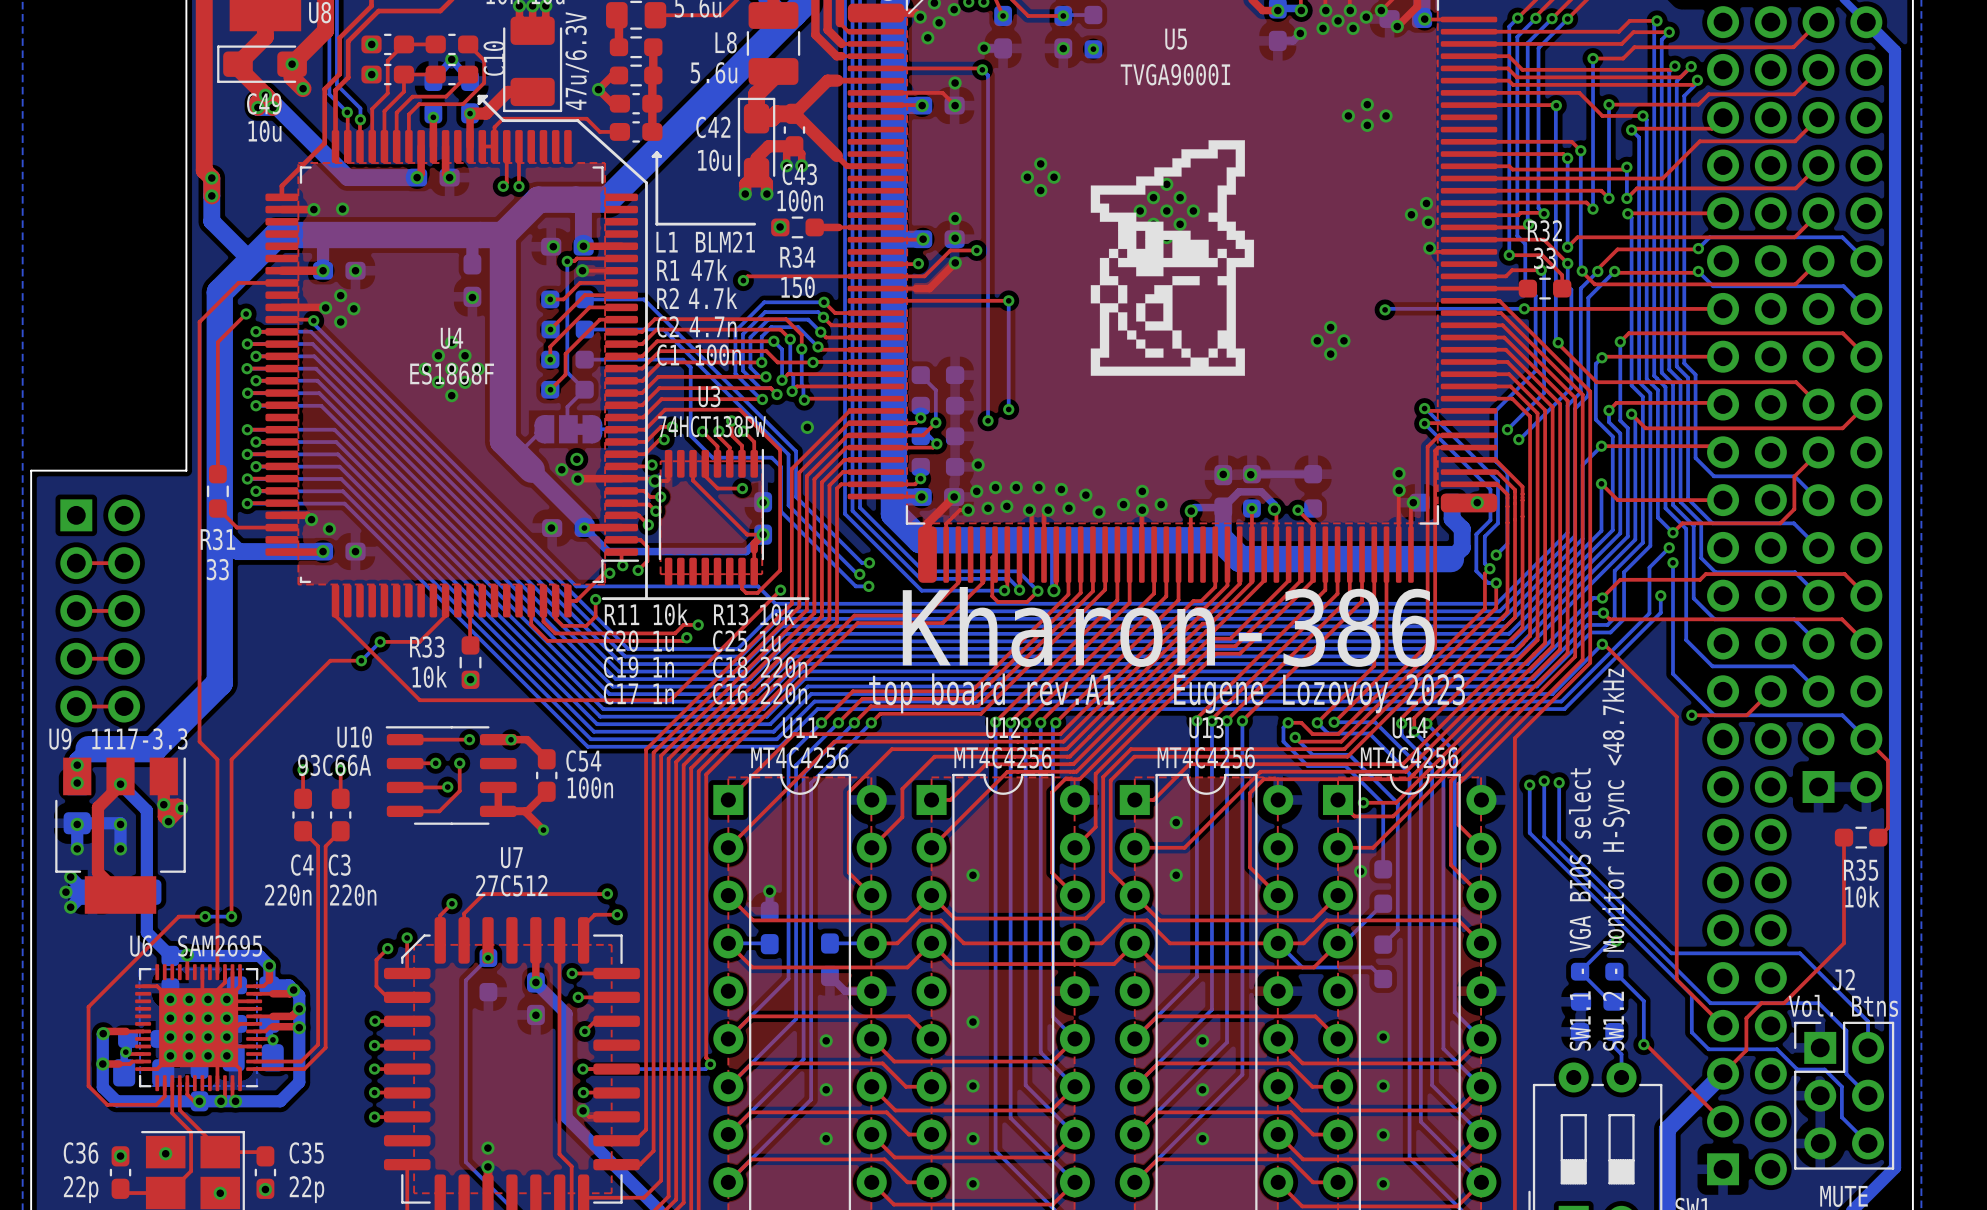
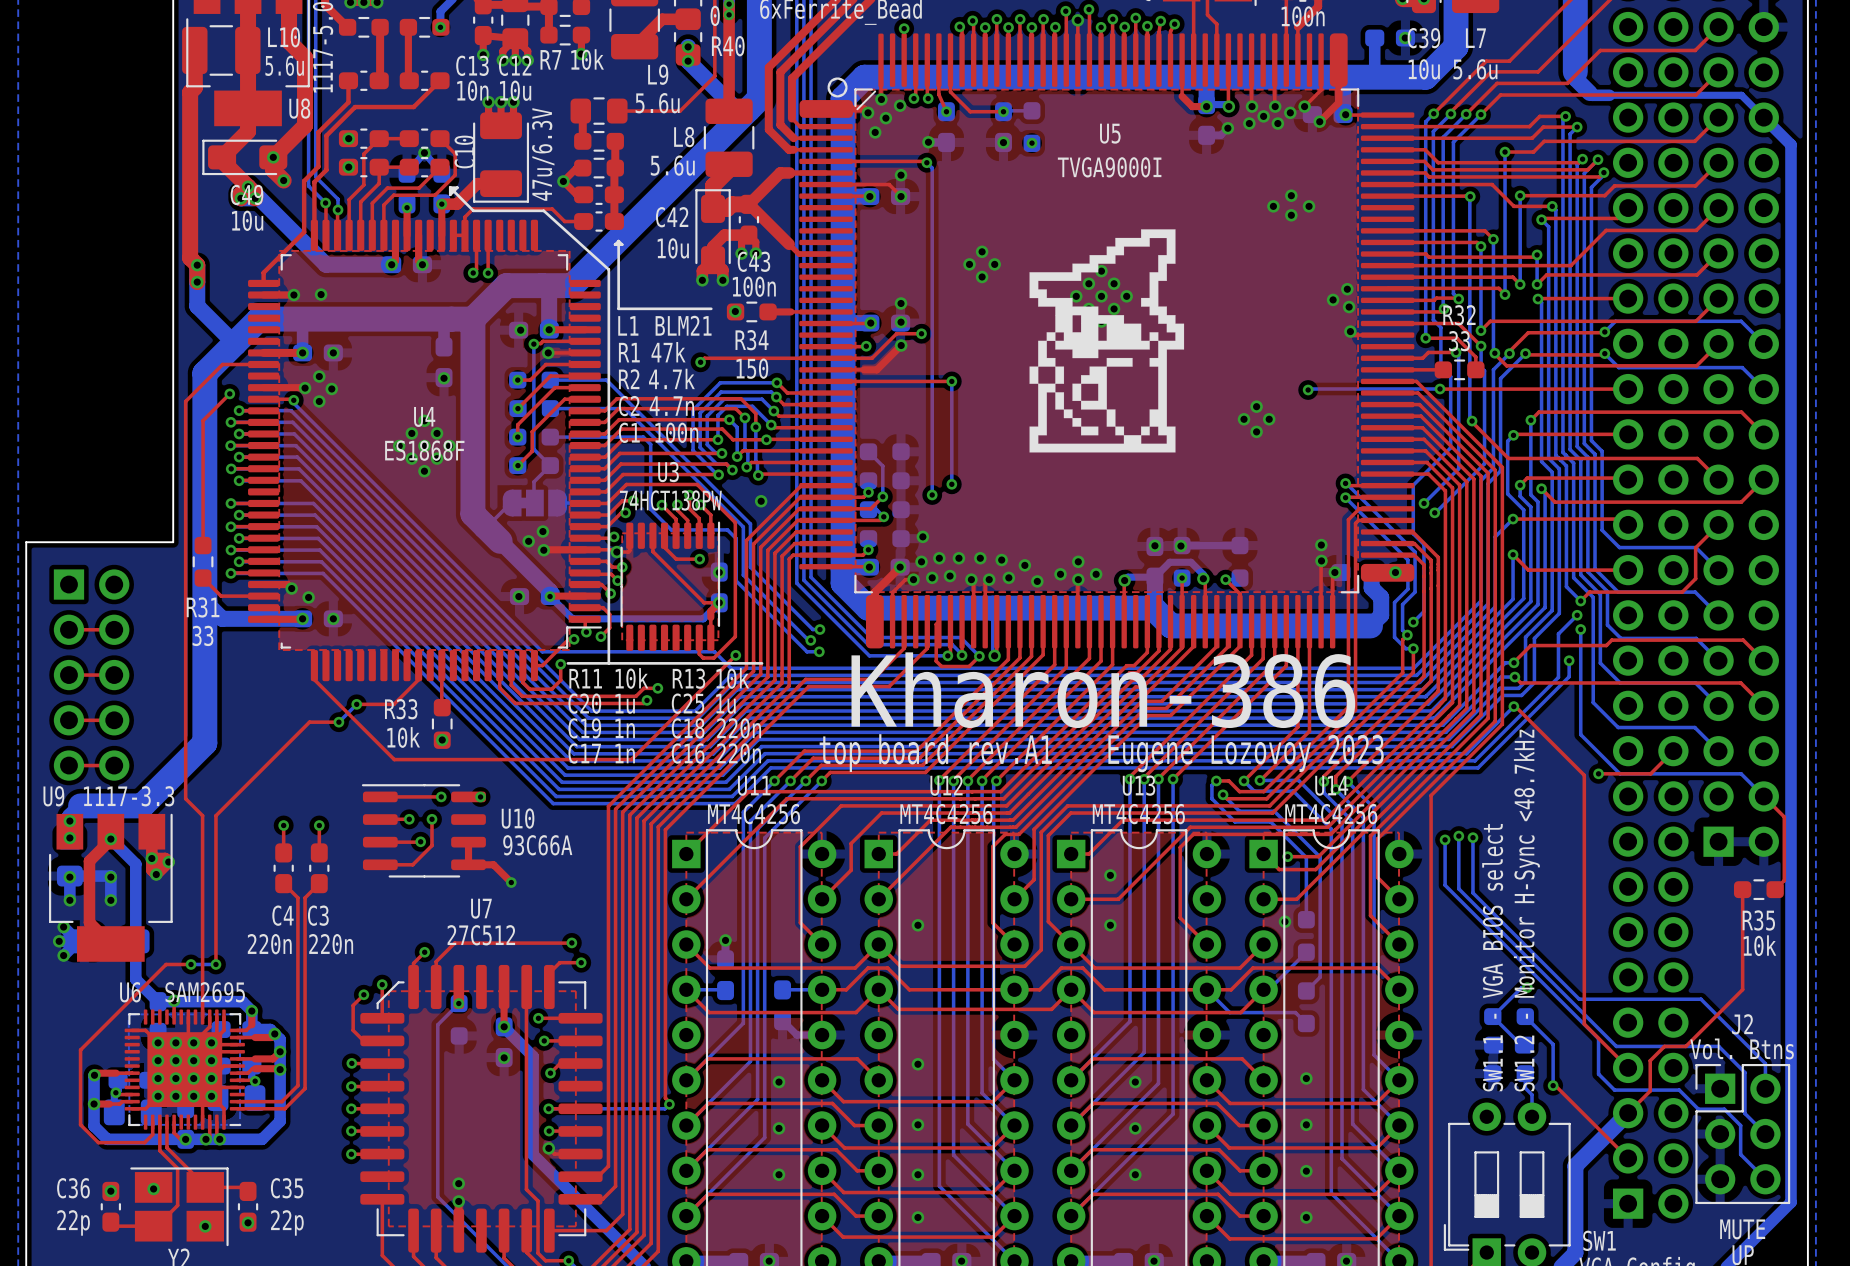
part rotation: 0° (568, 429) -> 180° (534, 503)
U10 name position: U10 (354, 737) -> U10 (518, 818)
top track: (510, 739) (527, 739) (546, 759) -> none
U10 value position: 93C66A (334, 765) -> 93C66A (537, 845)
C54: 100n (546, 775) -> none
top track: (546, 791) (527, 811) (524, 811) -> none

